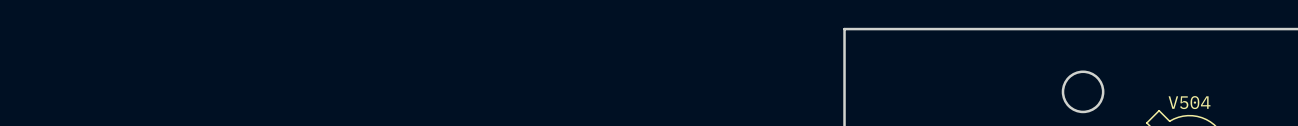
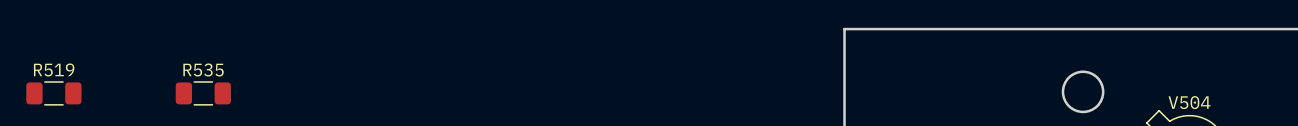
R519: none -> (53, 93)
R535: none -> (203, 93)

